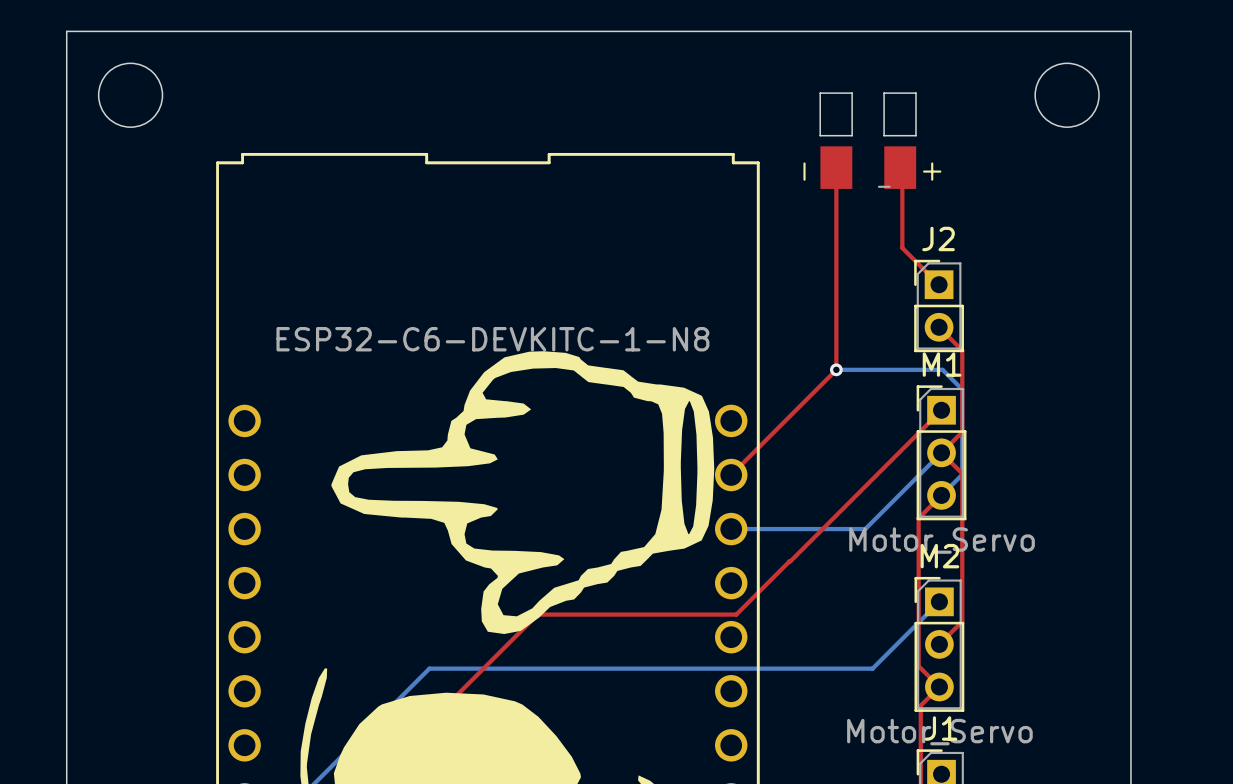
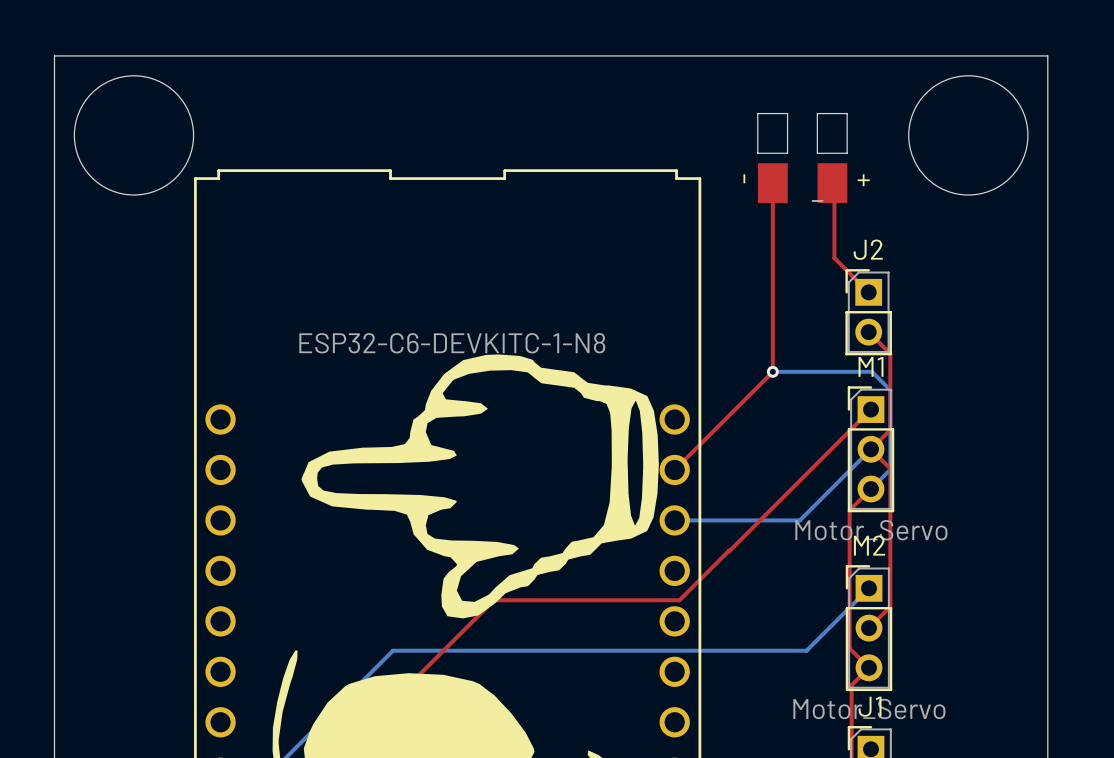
round board edge: none -> [73, 75, 195, 196]
round board edge: none -> [908, 75, 1029, 196]
round board edge: [98, 62, 164, 128] -> none
round board edge: [1034, 62, 1100, 128] -> none

